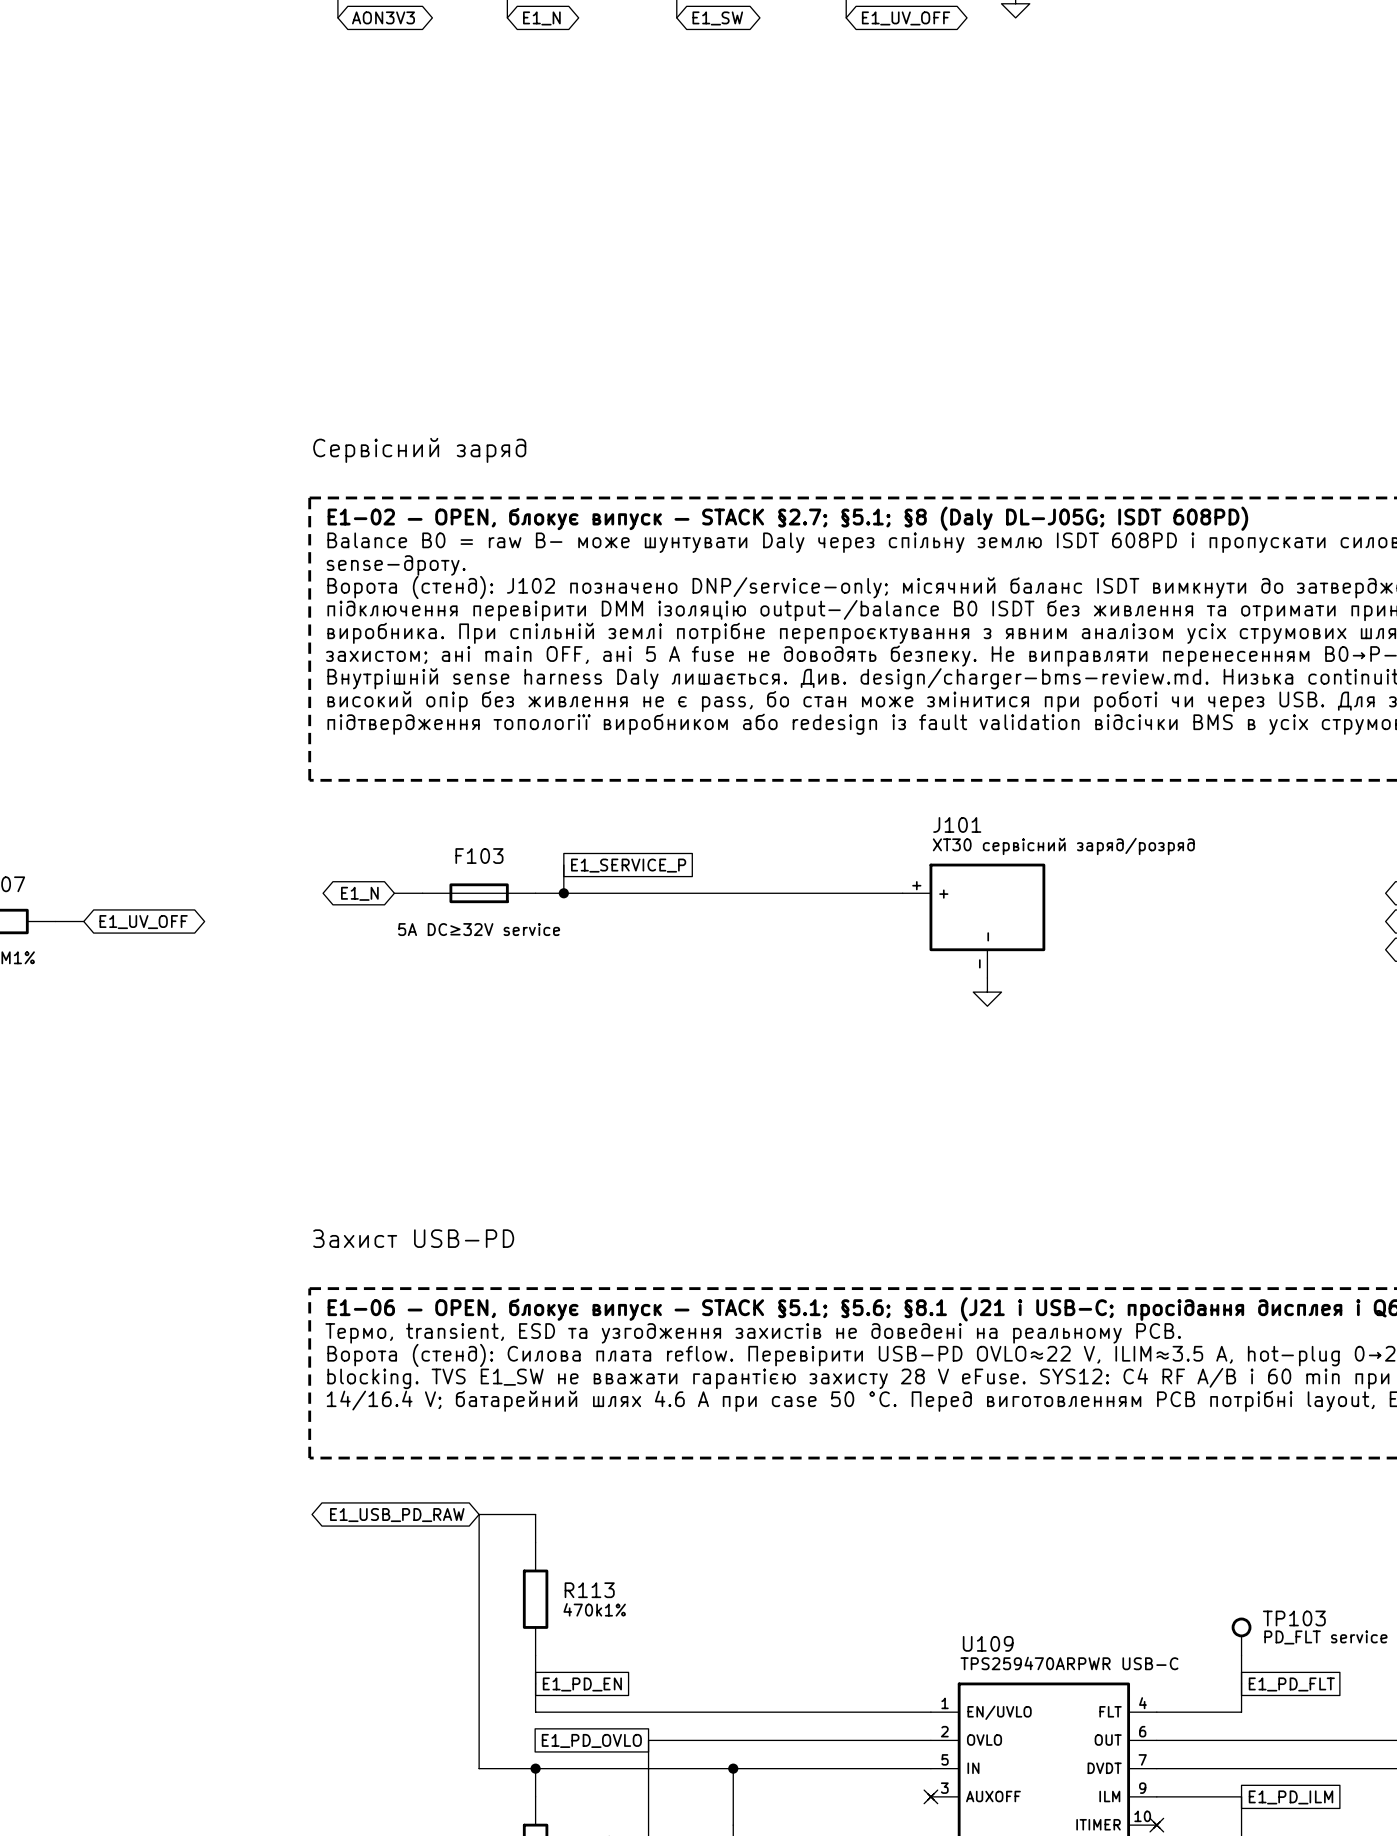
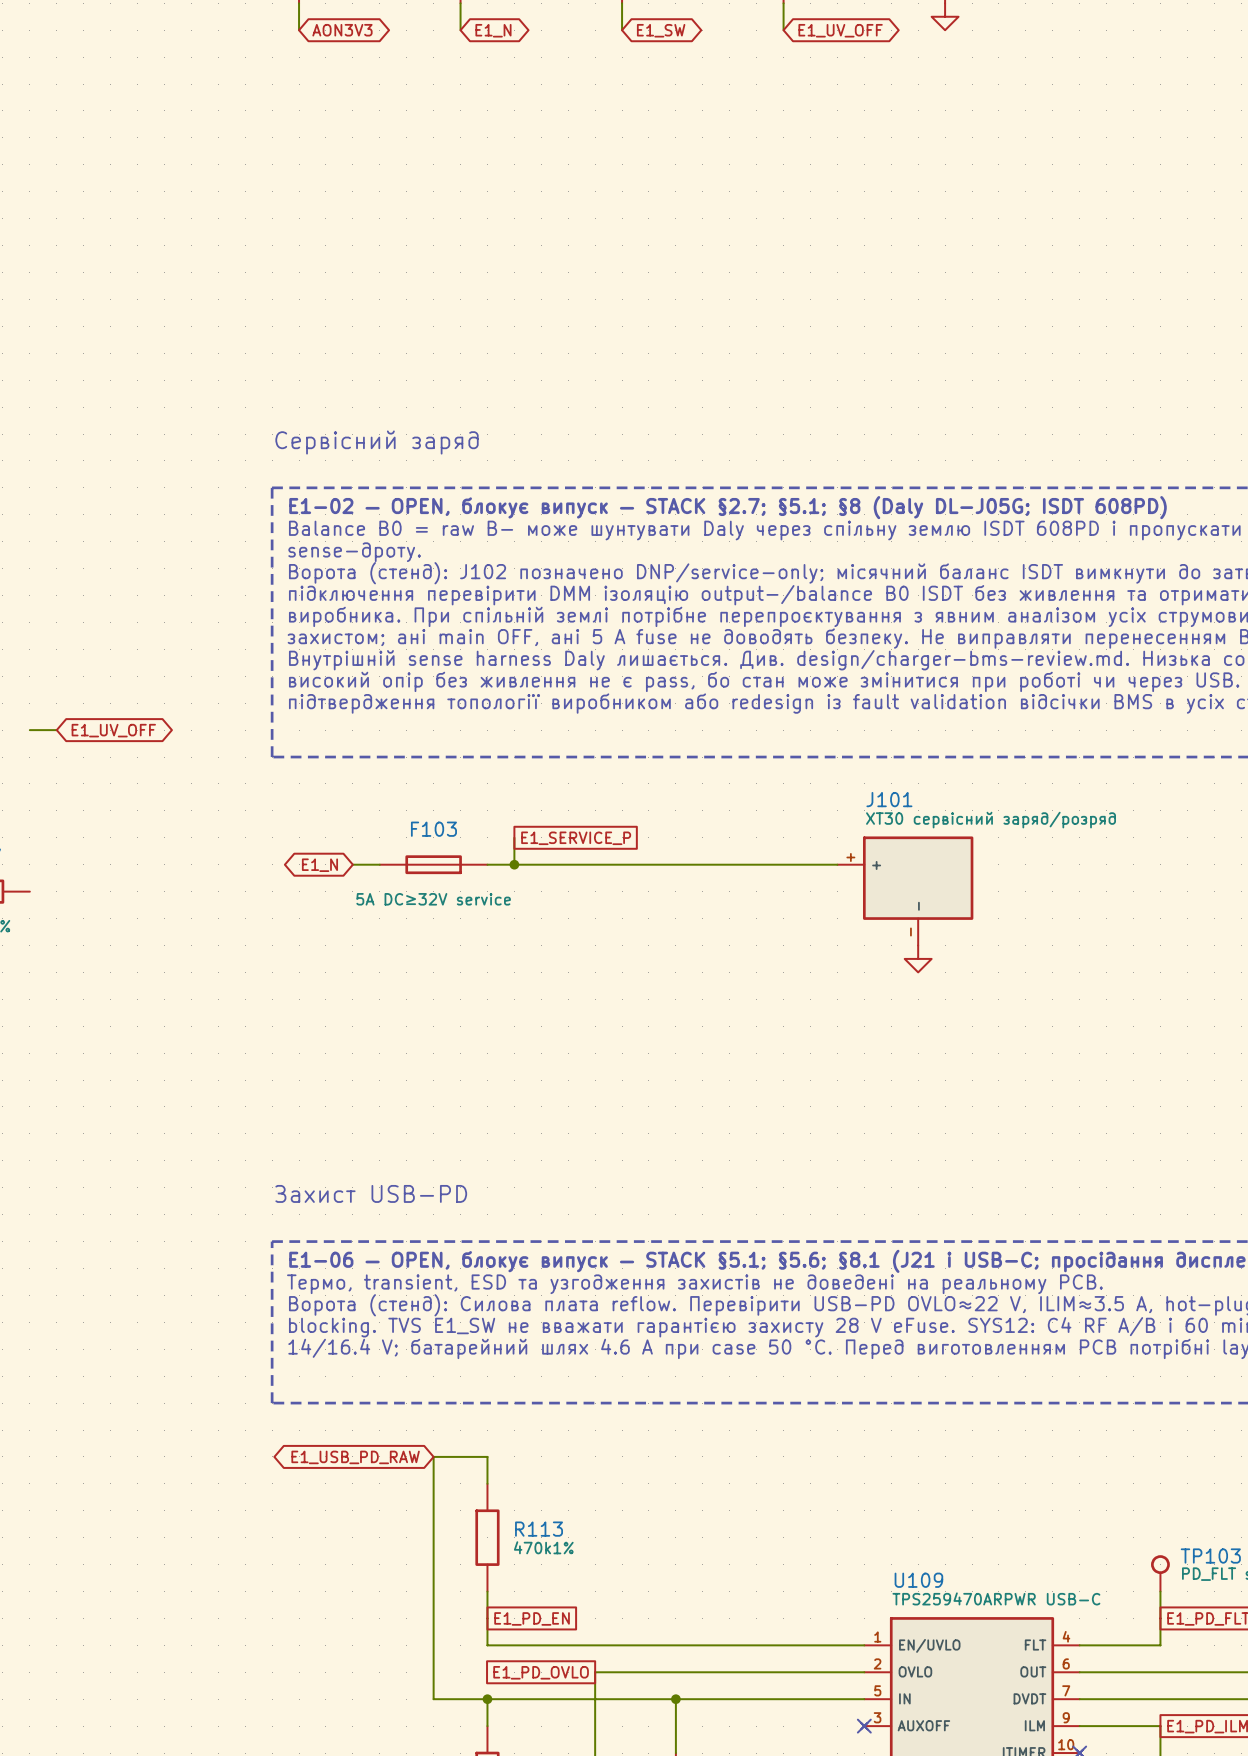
wire: (55, 921) (83, 921) -> (29, 730) (56, 730)
global label position: E1_UV_OFF (143, 922) -> E1_UV_OFF (113, 730)

